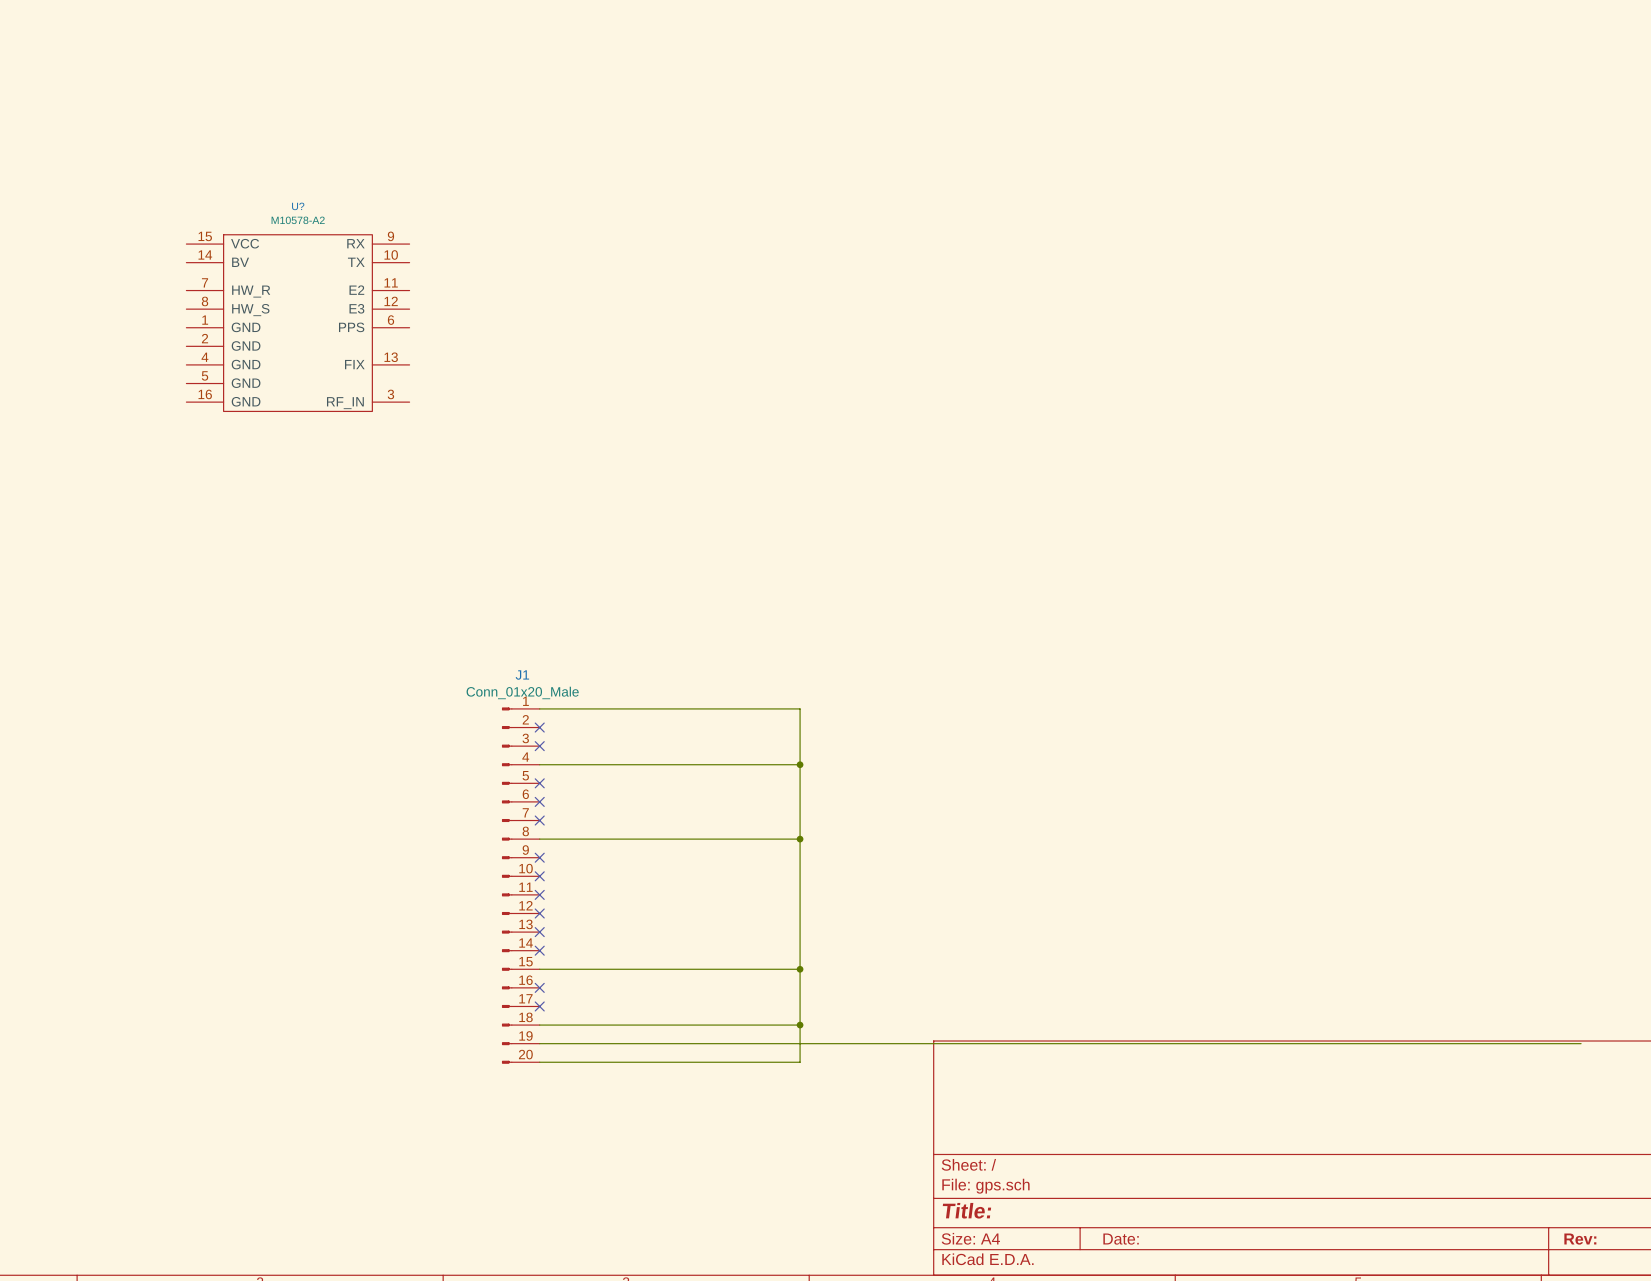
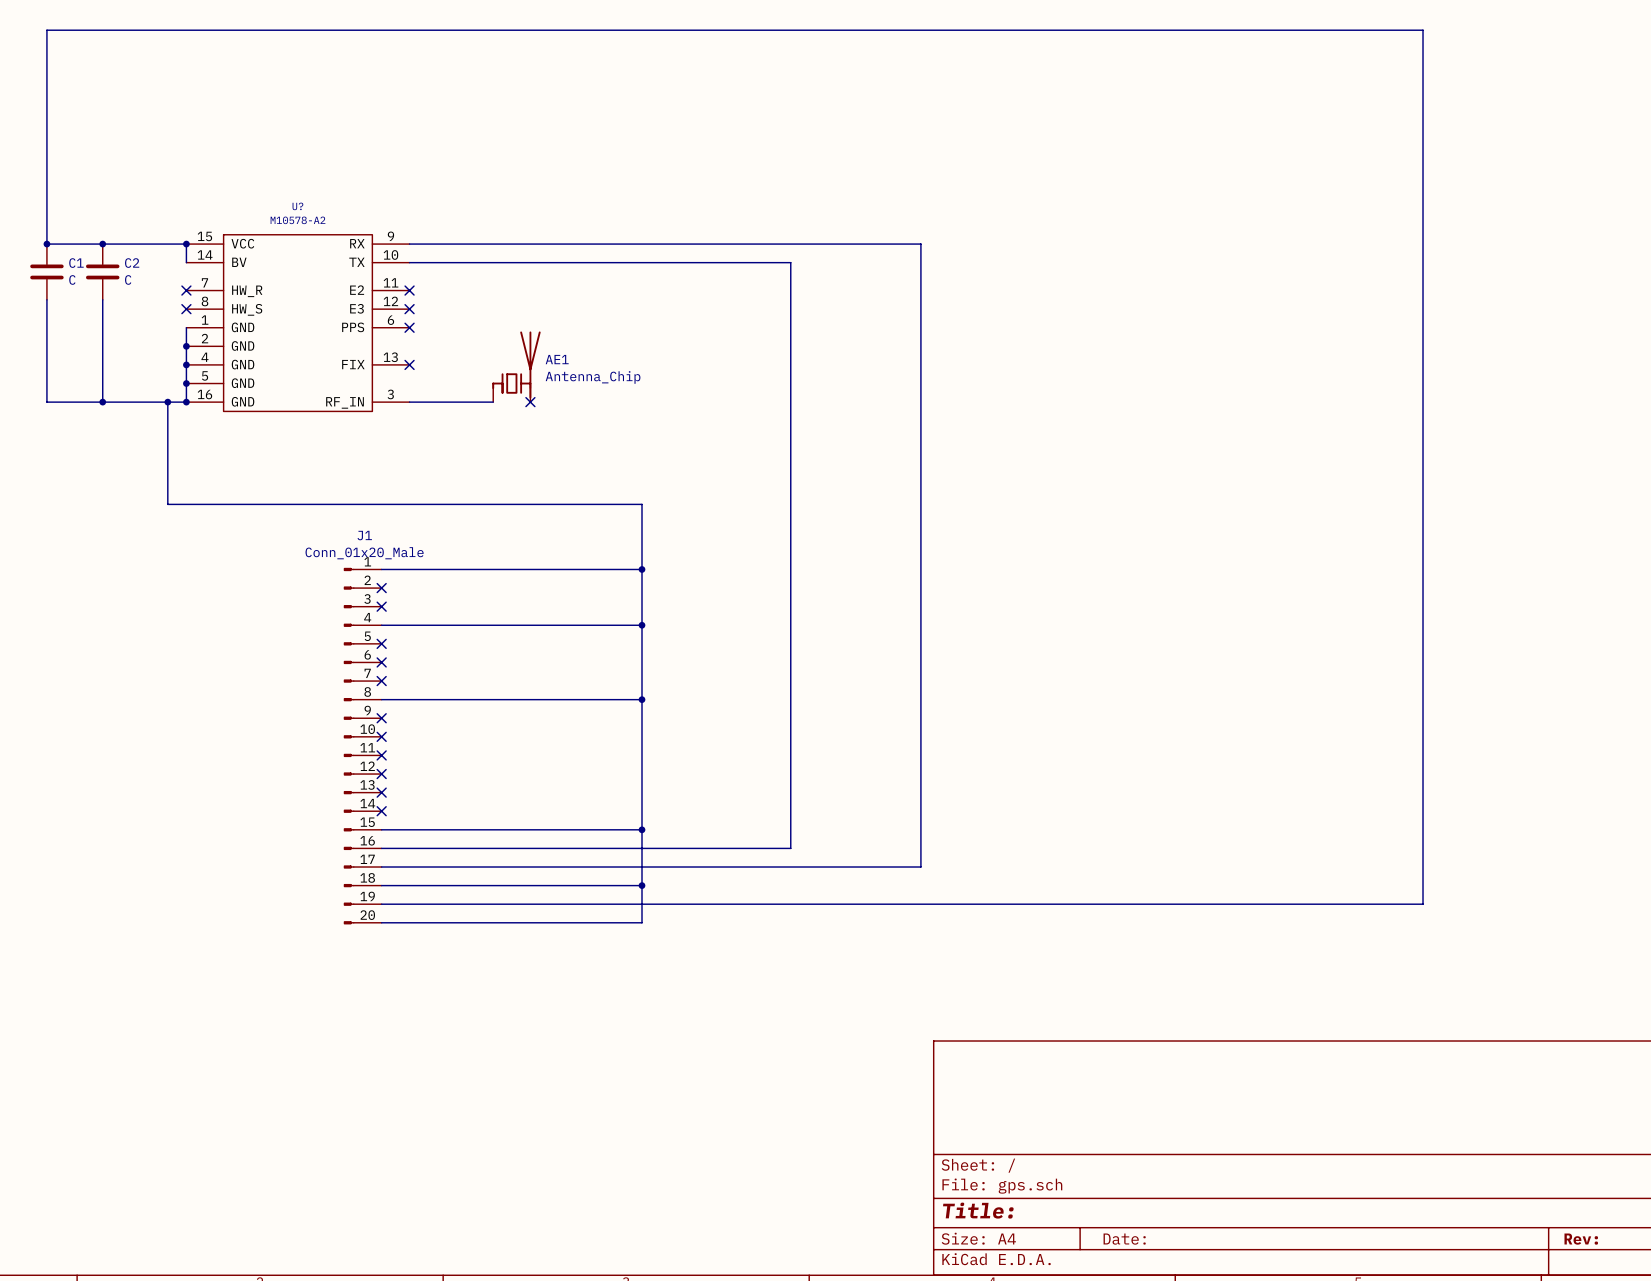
junction: none -> (46, 244)
junction: none -> (102, 244)
junction: none -> (186, 244)
wire: none -> (409, 244) (920, 244) (920, 867) (381, 867)
wire: none -> (186, 262) (186, 244) (46, 244) (46, 30) (1423, 30) (1423, 904) (381, 904)
wire: none -> (409, 262) (790, 262) (790, 848) (381, 848)
C1: none -> C (46, 271)
C2: none -> C (102, 271)
no-connect mark: none -> (186, 290)
no-connect mark: none -> (409, 290)
wire: none -> (46, 299) (46, 402) (186, 402) (186, 327)
wire: none -> (102, 299) (102, 402)
no-connect mark: none -> (186, 309)
no-connect mark: none -> (409, 309)
no-connect mark: none -> (409, 327)
junction: none -> (186, 346)
junction: none -> (186, 364)
no-connect mark: none -> (409, 364)
AE1: none -> Antenna_Chip (516, 366)
junction: none -> (186, 383)
junction: none -> (102, 402)
wire: none -> (167, 402) (167, 504) (642, 504) (642, 922) (381, 922)
junction: none -> (167, 402)
junction: none -> (186, 402)
wire: none -> (409, 402) (493, 402)
no-connect mark: none -> (530, 402)
wire: none -> (381, 569) (642, 569)
junction: none -> (642, 569)
no-connect mark: none -> (381, 588)
no-connect mark: none -> (381, 606)
wire: none -> (381, 625) (642, 625)
junction: none -> (642, 625)
no-connect mark: none -> (381, 643)
no-connect mark: none -> (381, 662)
no-connect mark: none -> (381, 681)
junction: none -> (642, 699)
wire: (539, 708) (800, 708) (800, 1062) (539, 1062) -> none
no-connect mark: none -> (381, 718)
no-connect mark: (539, 727) -> none
no-connect mark: none -> (381, 736)
no-connect mark: (539, 746) -> none
no-connect mark: none -> (381, 755)
wire: (539, 764) (800, 764) -> (381, 699) (642, 699)
junction: (800, 764) -> none
no-connect mark: none -> (381, 774)
no-connect mark: (539, 783) -> none
no-connect mark: none -> (381, 792)
no-connect mark: (539, 801) -> none
no-connect mark: none -> (381, 811)
no-connect mark: (539, 820) -> none
junction: none -> (642, 829)
wire: (539, 839) (800, 839) -> (381, 829) (642, 829)
junction: (800, 839) -> none
no-connect mark: (539, 857) -> none
no-connect mark: (539, 876) -> none
J1 position: (520, 885) -> (362, 746)
junction: none -> (642, 885)
no-connect mark: (539, 894) -> none
no-connect mark: (539, 913) -> none
no-connect mark: (539, 932) -> none
no-connect mark: (539, 950) -> none
wire: (539, 969) (800, 969) -> (381, 885) (642, 885)
junction: (800, 969) -> none
no-connect mark: (539, 987) -> none
no-connect mark: (539, 1006) -> none
wire: (539, 1025) (800, 1025) -> none
junction: (800, 1025) -> none
wire: (539, 1043) (1581, 1043) -> none

